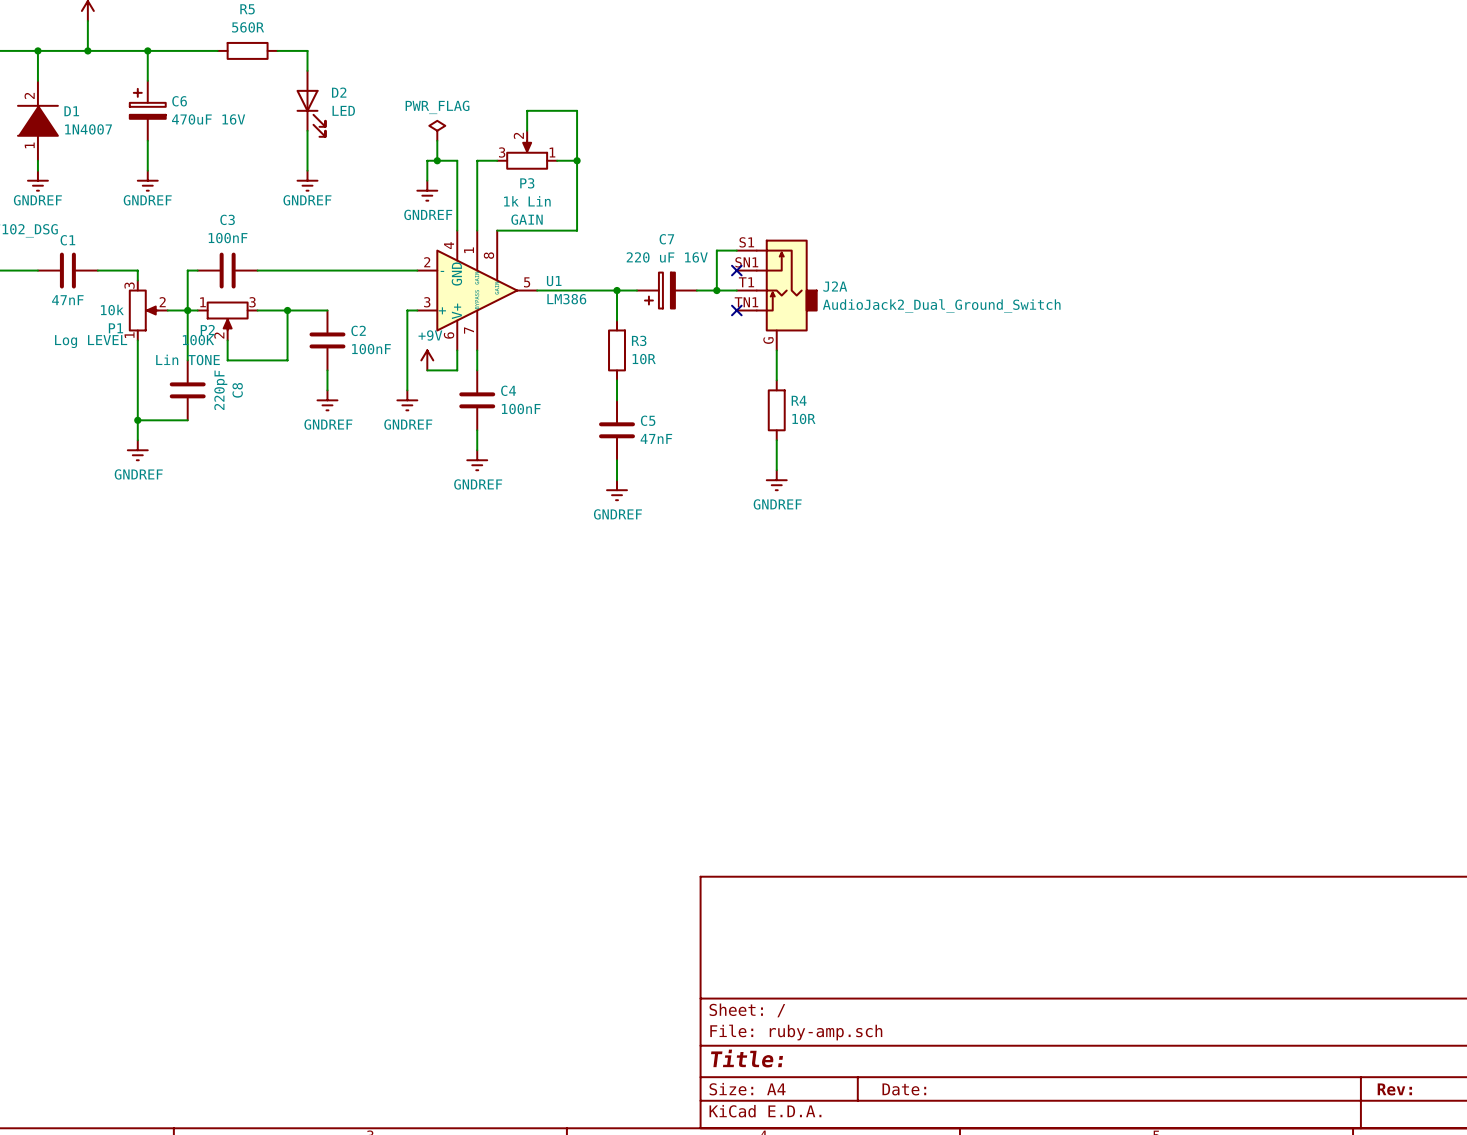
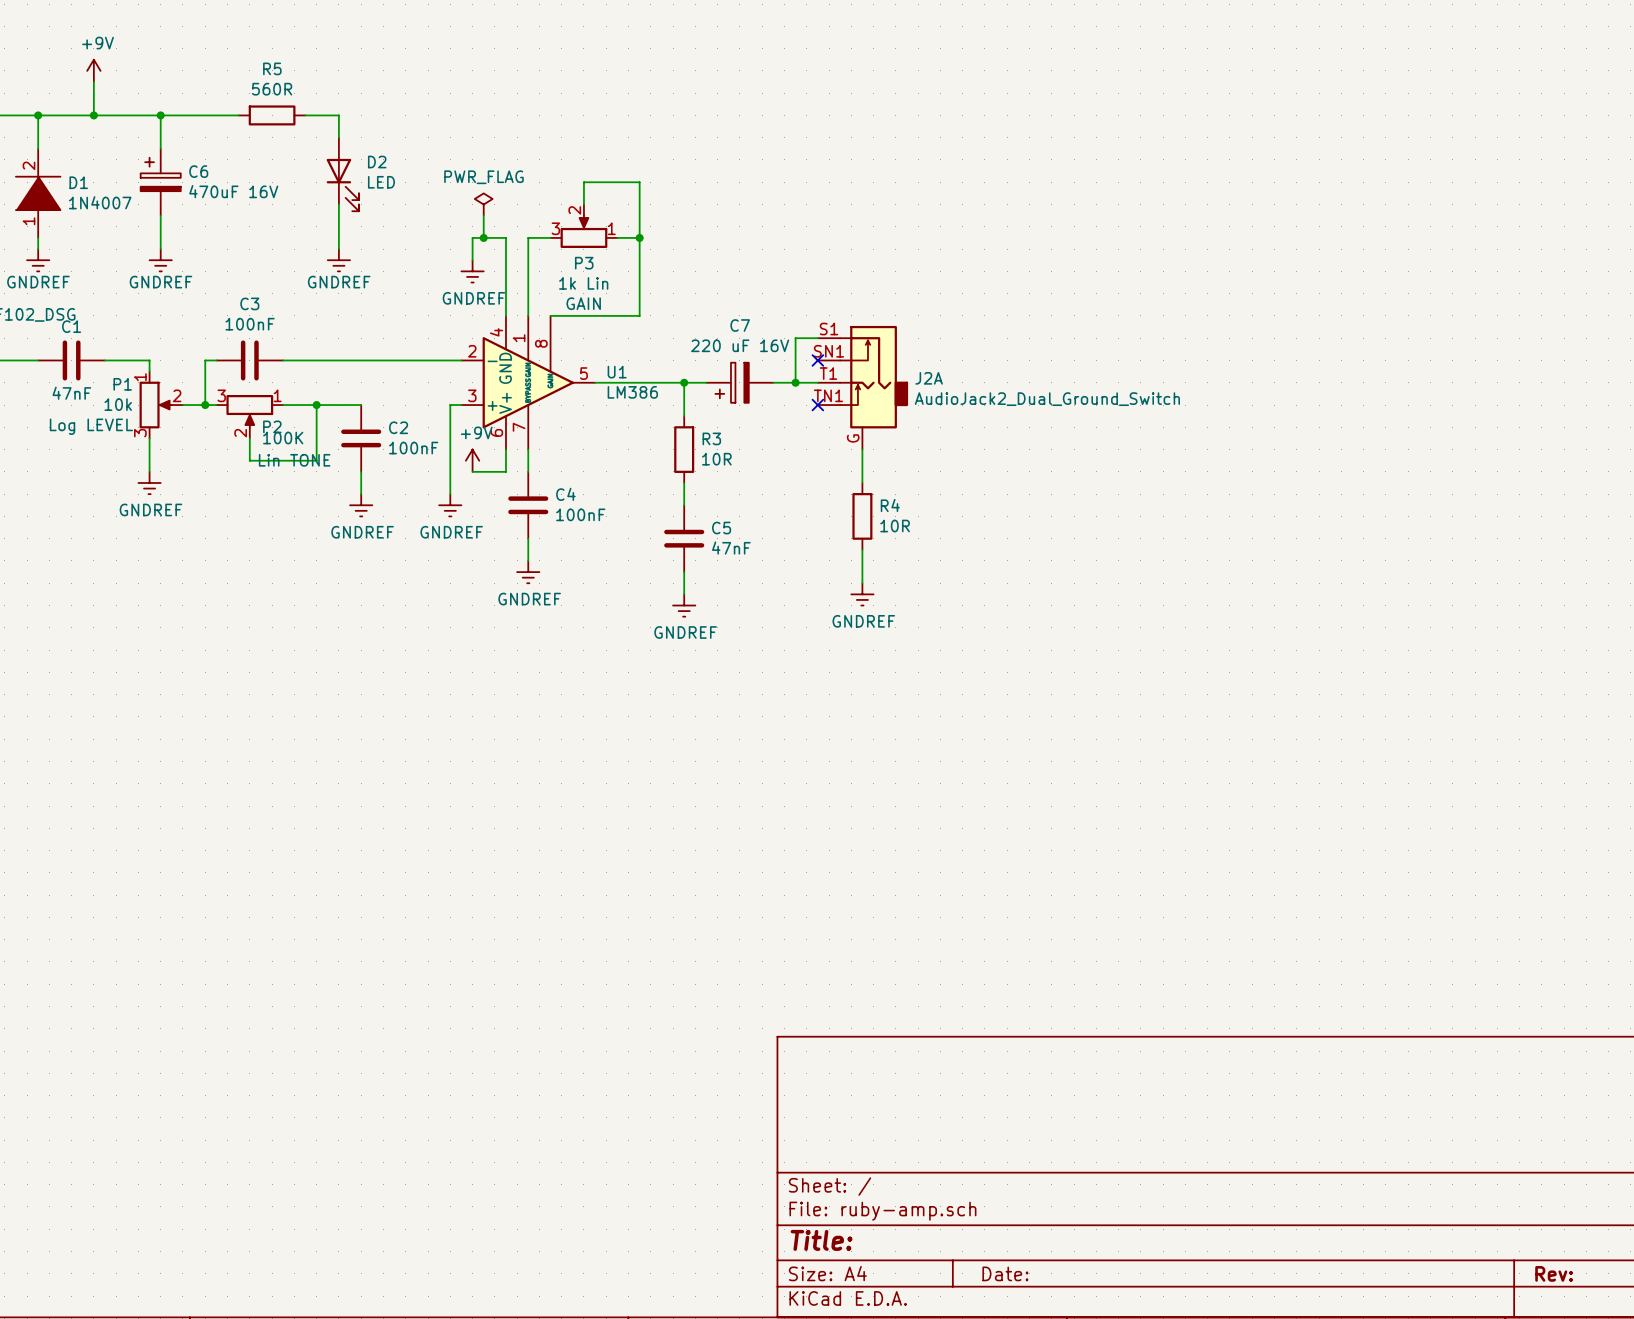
P1 flip: as is (143, 310) -> up-down (155, 405)
wire: (187, 310) (187, 360) -> none
P2 flip: as is (227, 315) -> left-right (249, 411)
wire: (137, 370) (137, 440) -> none
C8: 220pF (187, 390) -> none
wire: (137, 420) (187, 420) -> none
junction: (137, 420) -> none
power symbol position: GNDREF (137, 450) -> GNDREF (149, 482)

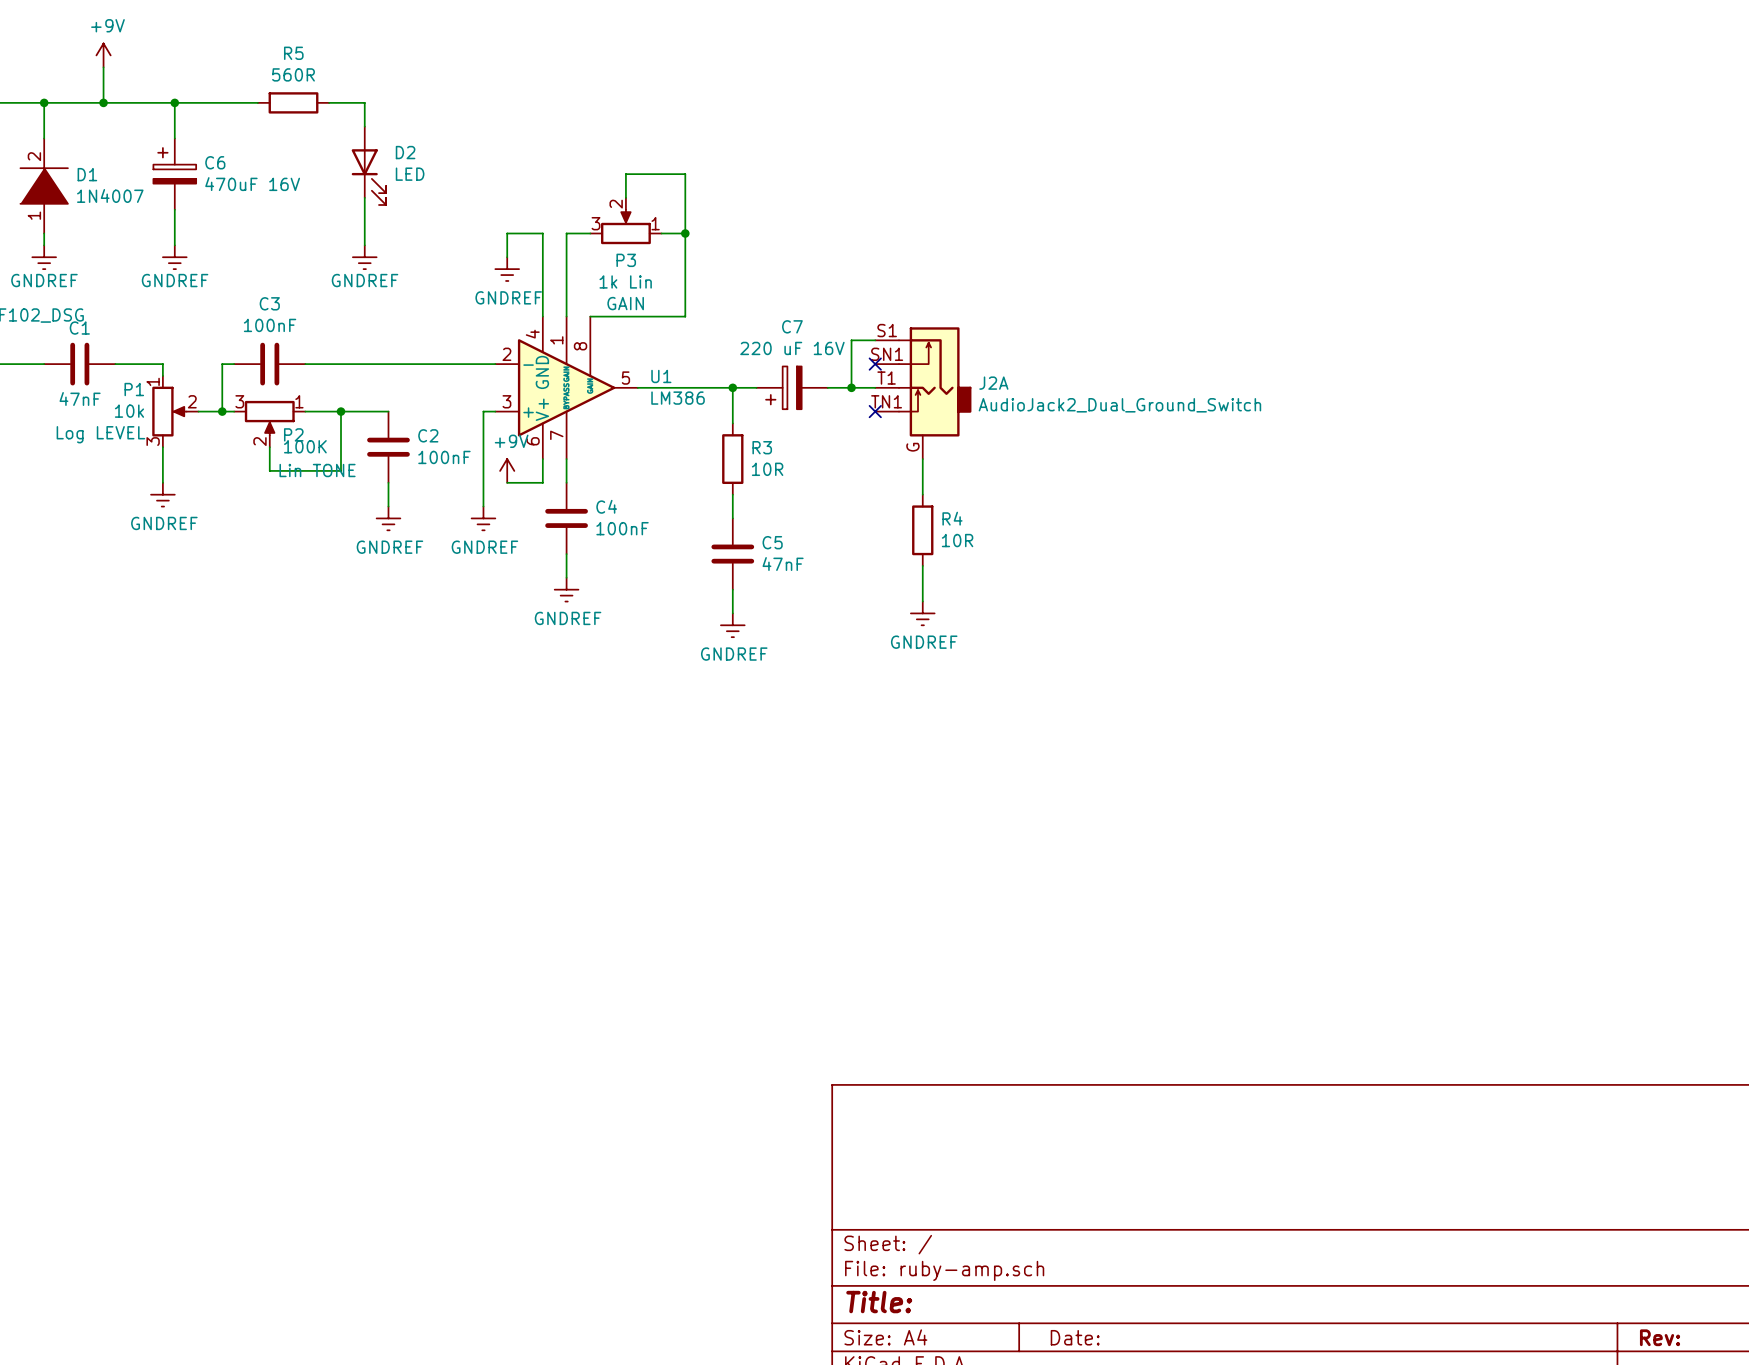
power symbol: PWR_FLAG (483, 204) -> none
wire: (483, 215) (483, 237) -> none
junction: (483, 237) -> none

